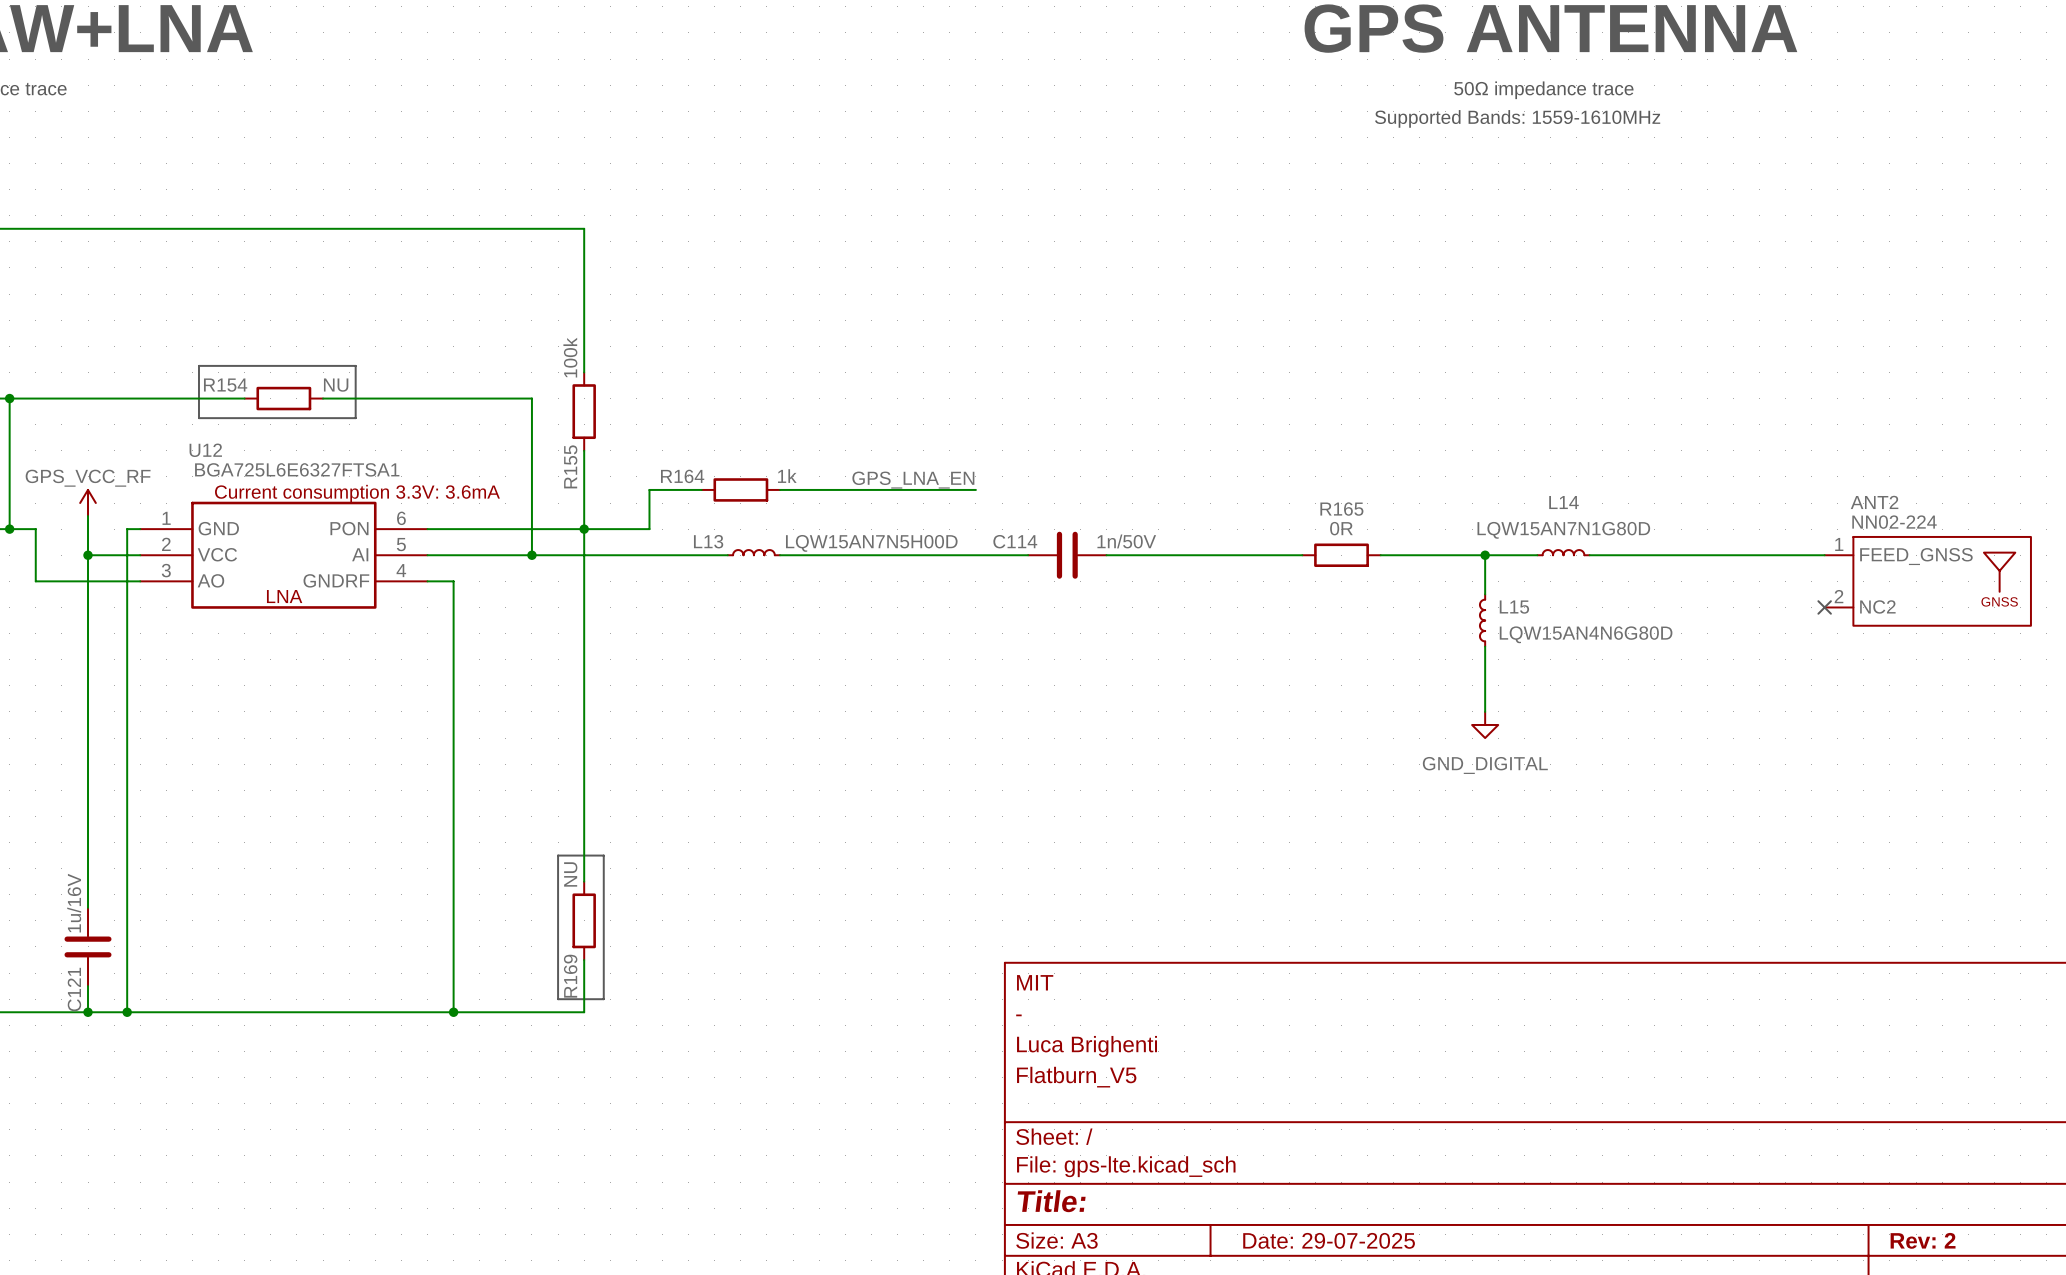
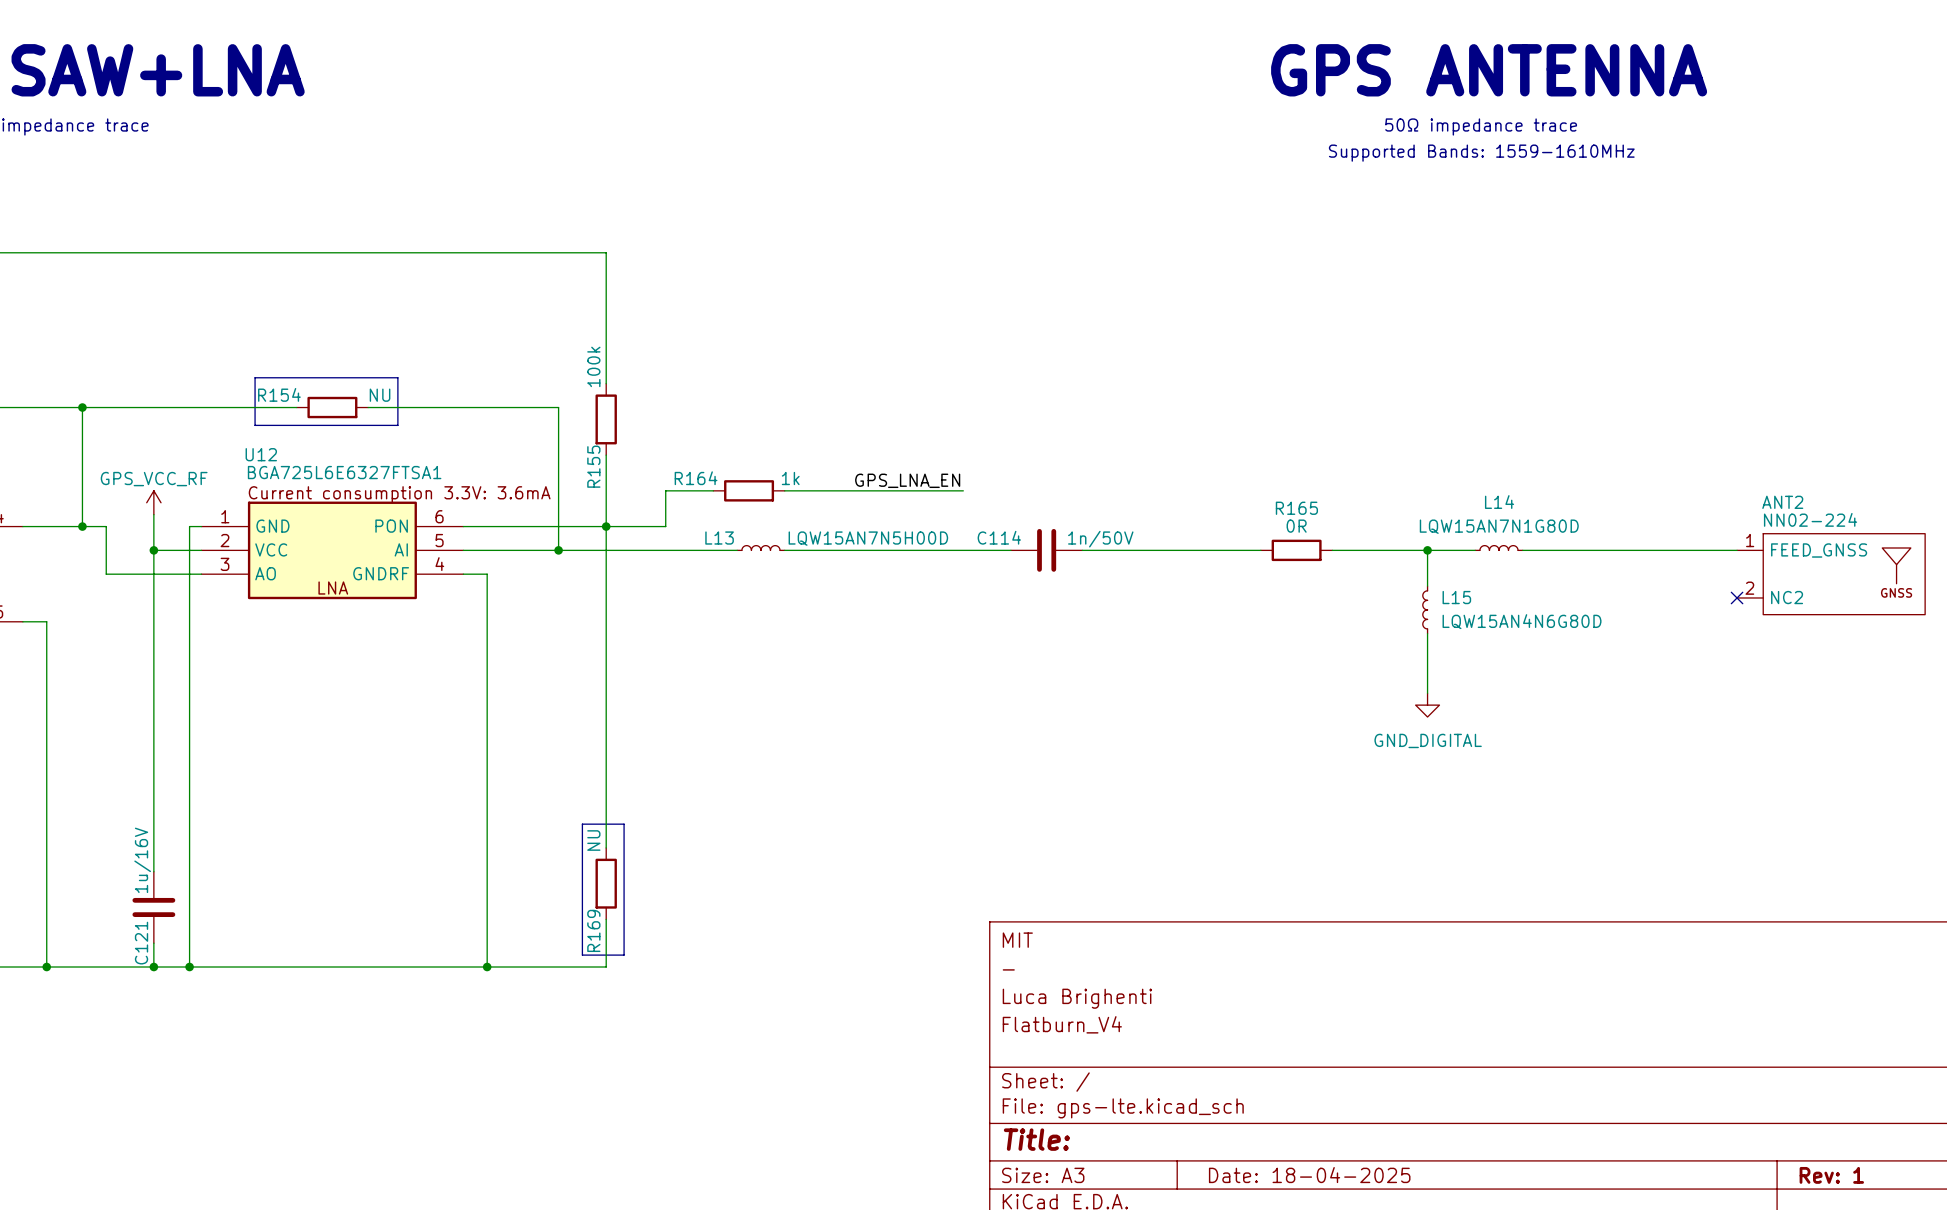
title block: Flatburn_V5 (1076, 1077) -> Flatburn_V4 (1062, 1024)
title block: Date: 29-07-2025 (1329, 1240) -> Date: 18-04-2025 (1309, 1175)
title block: Rev: 2 (1923, 1240) -> Rev: 1 (1831, 1175)

